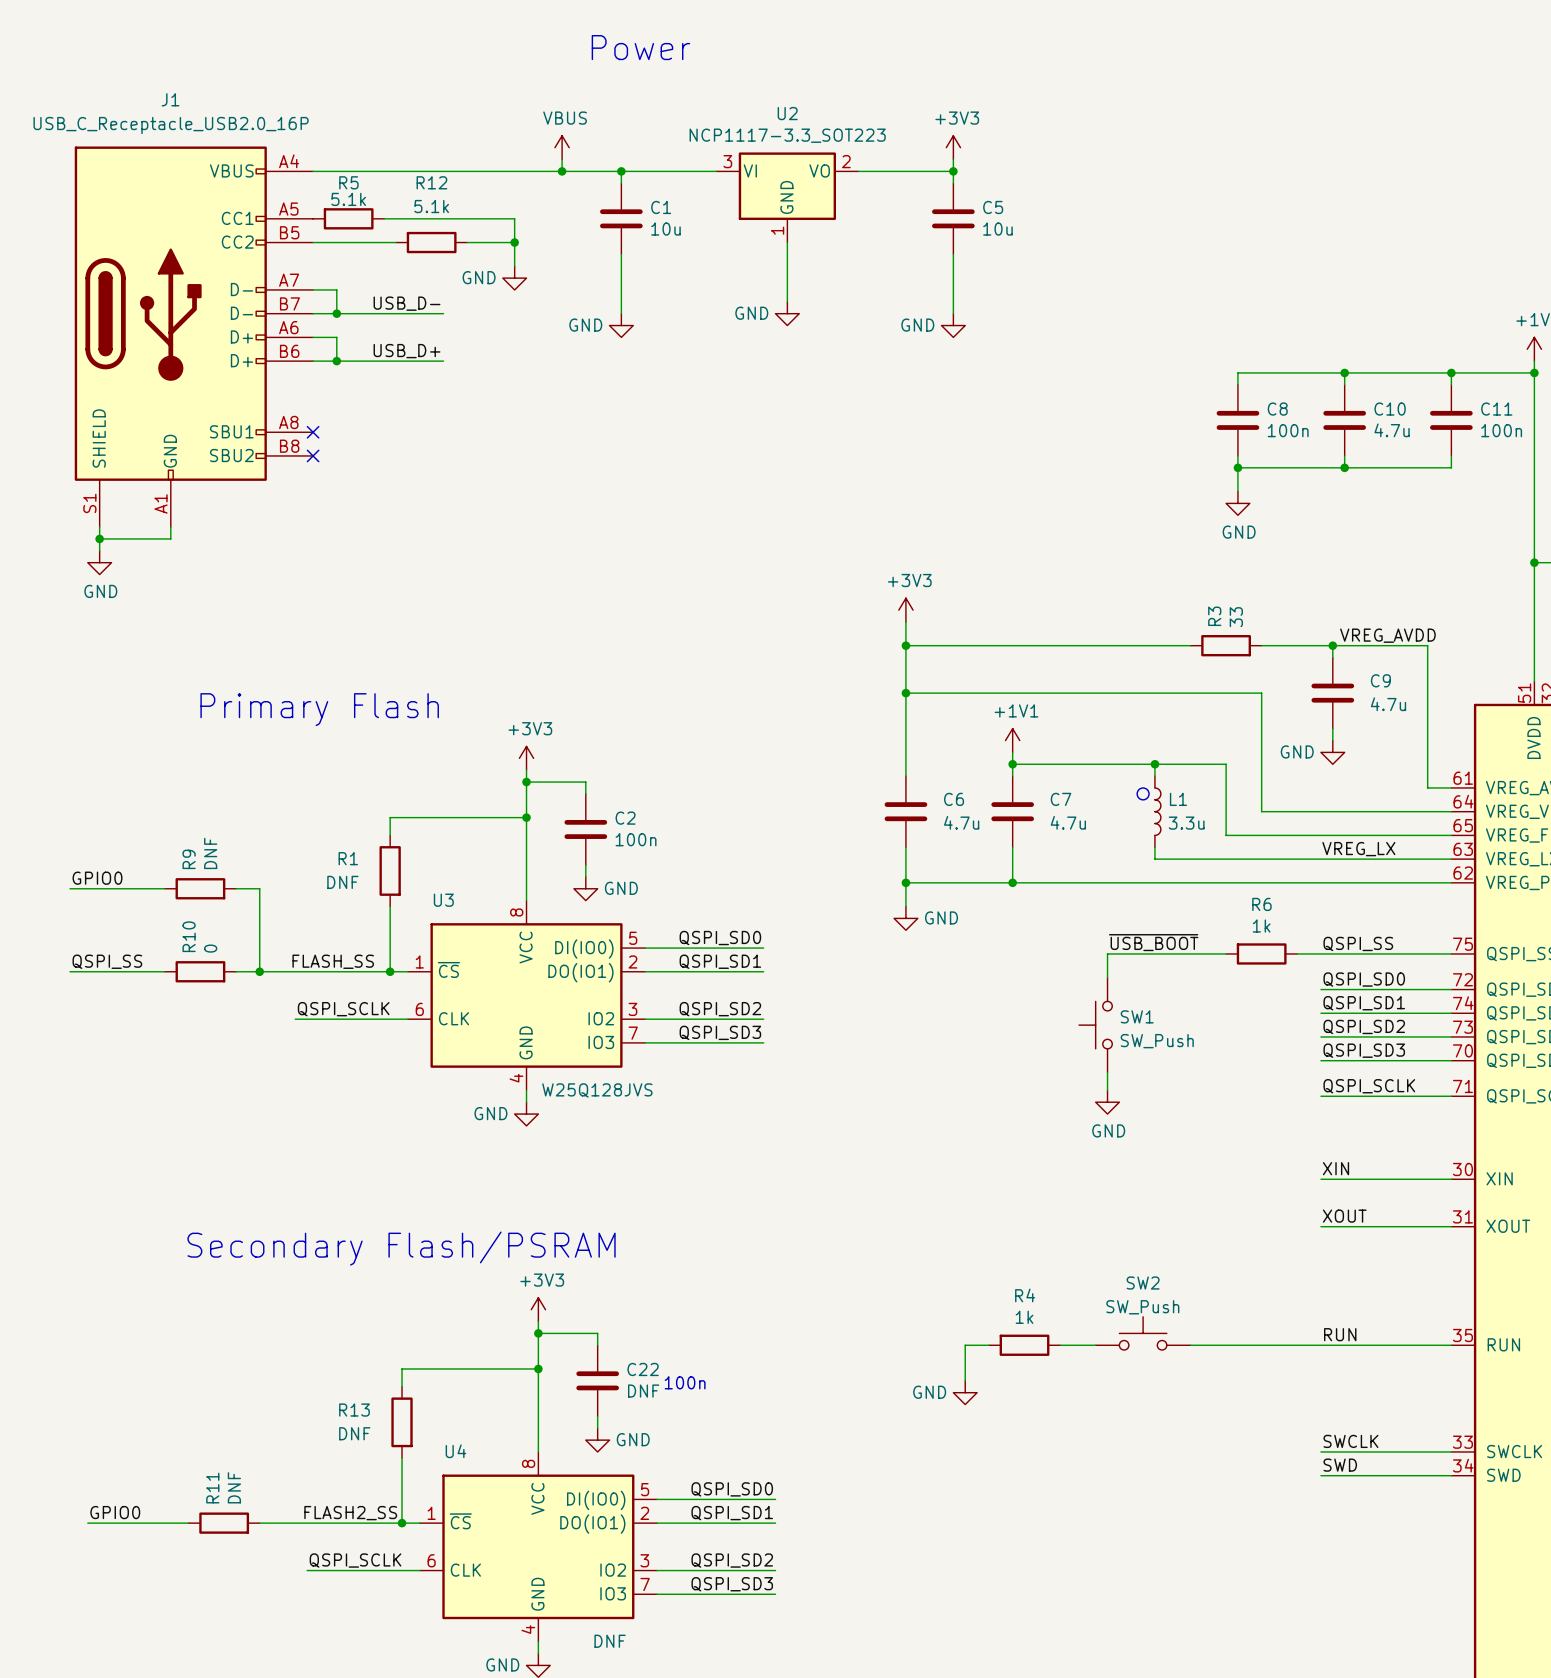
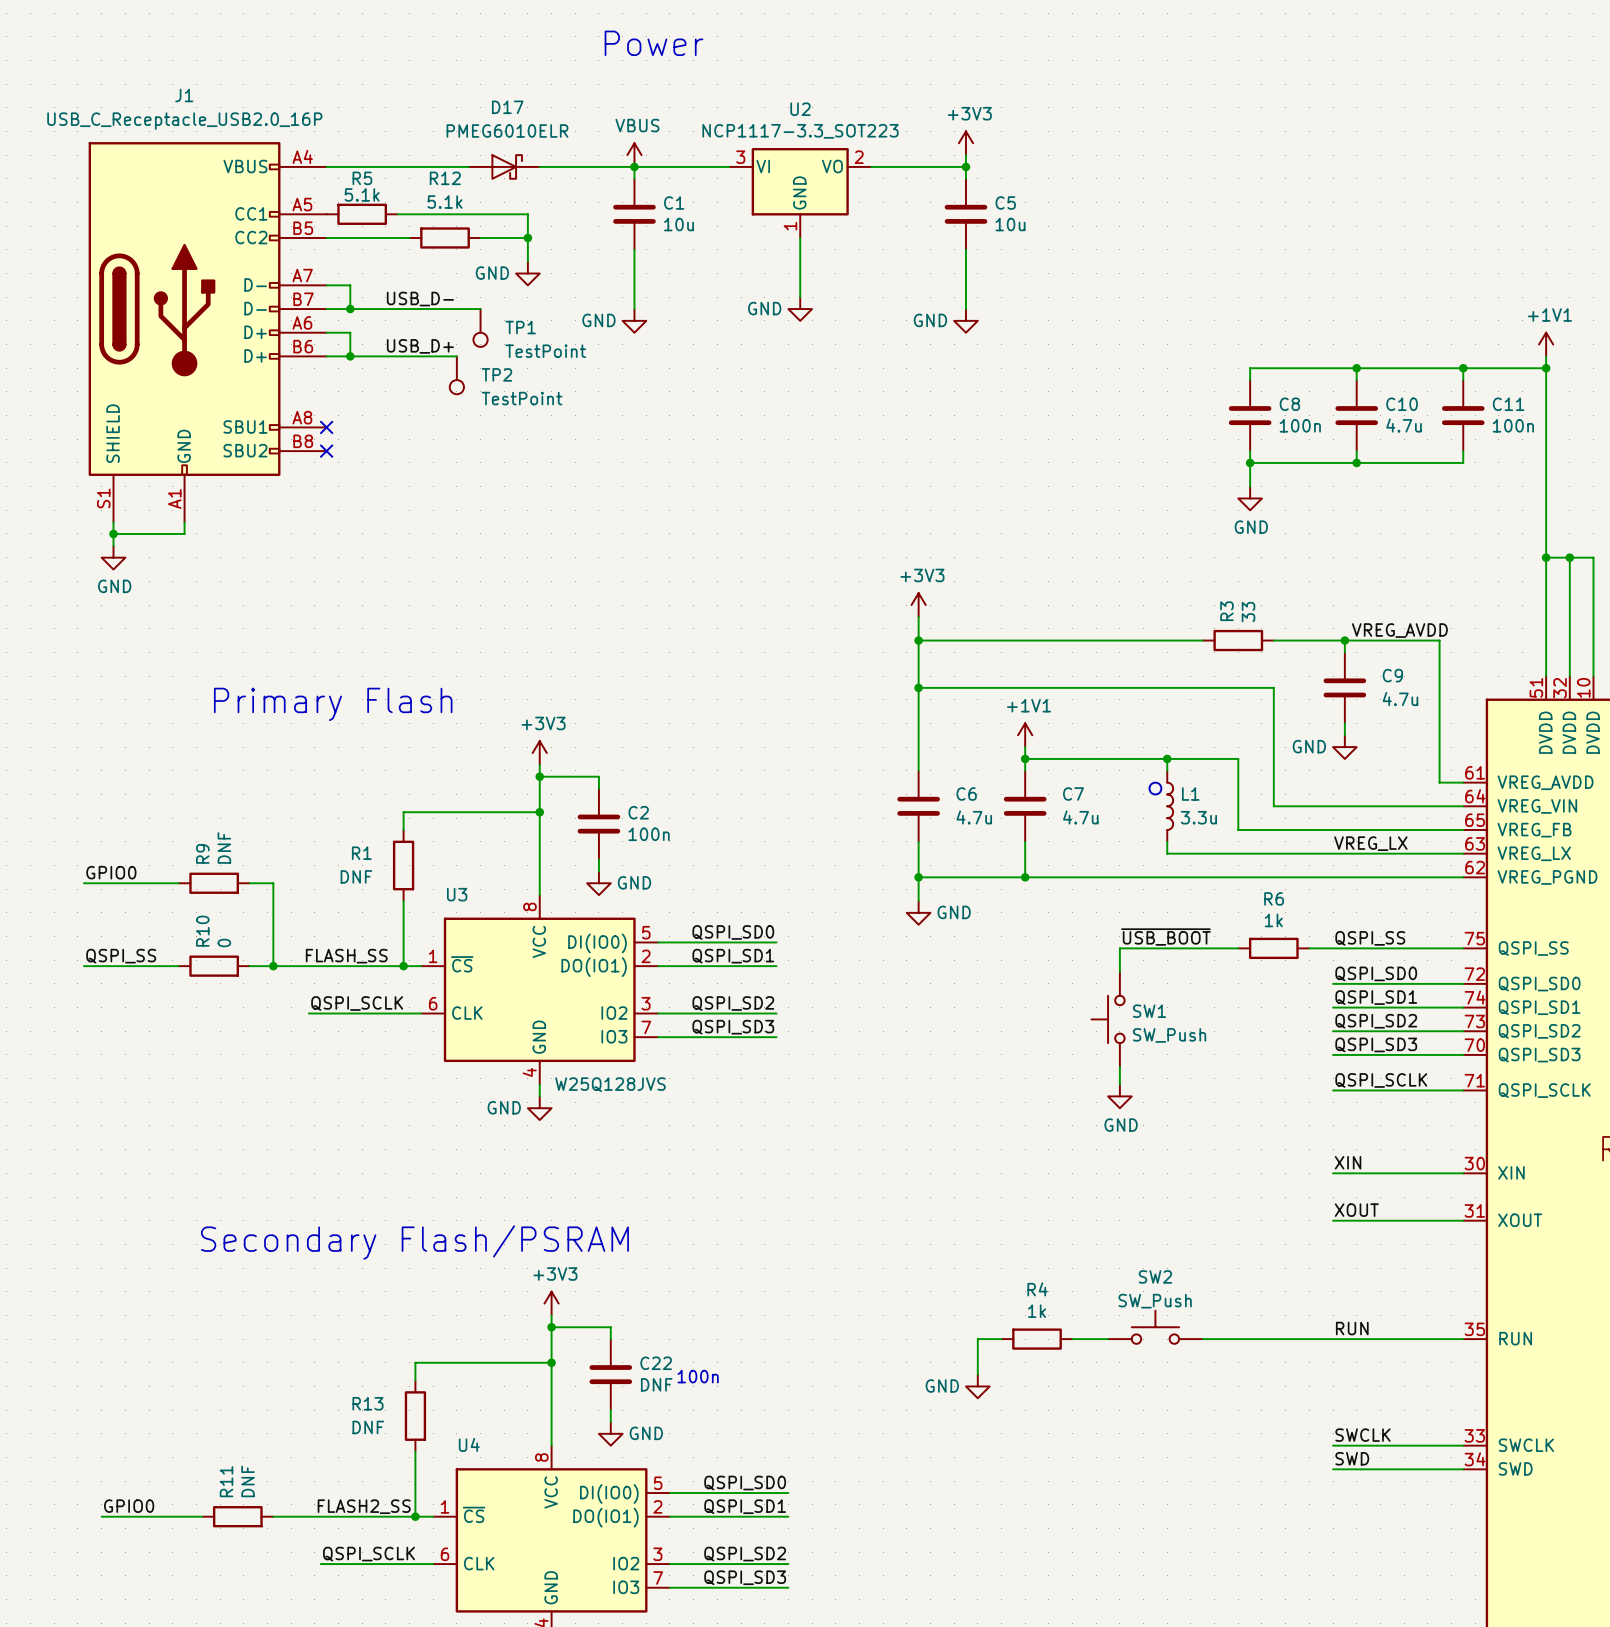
power symbol position: VBUS (562, 147) -> VBUS (634, 155)
wire: (562, 159) (562, 171) -> none
D17: none -> PMEG6010ELR (504, 166)
junction: (562, 171) -> none
wire: none -> (456, 309) (480, 309)
TP1: none -> TestPoint (480, 327)
TP2: none -> TestPoint (456, 375)

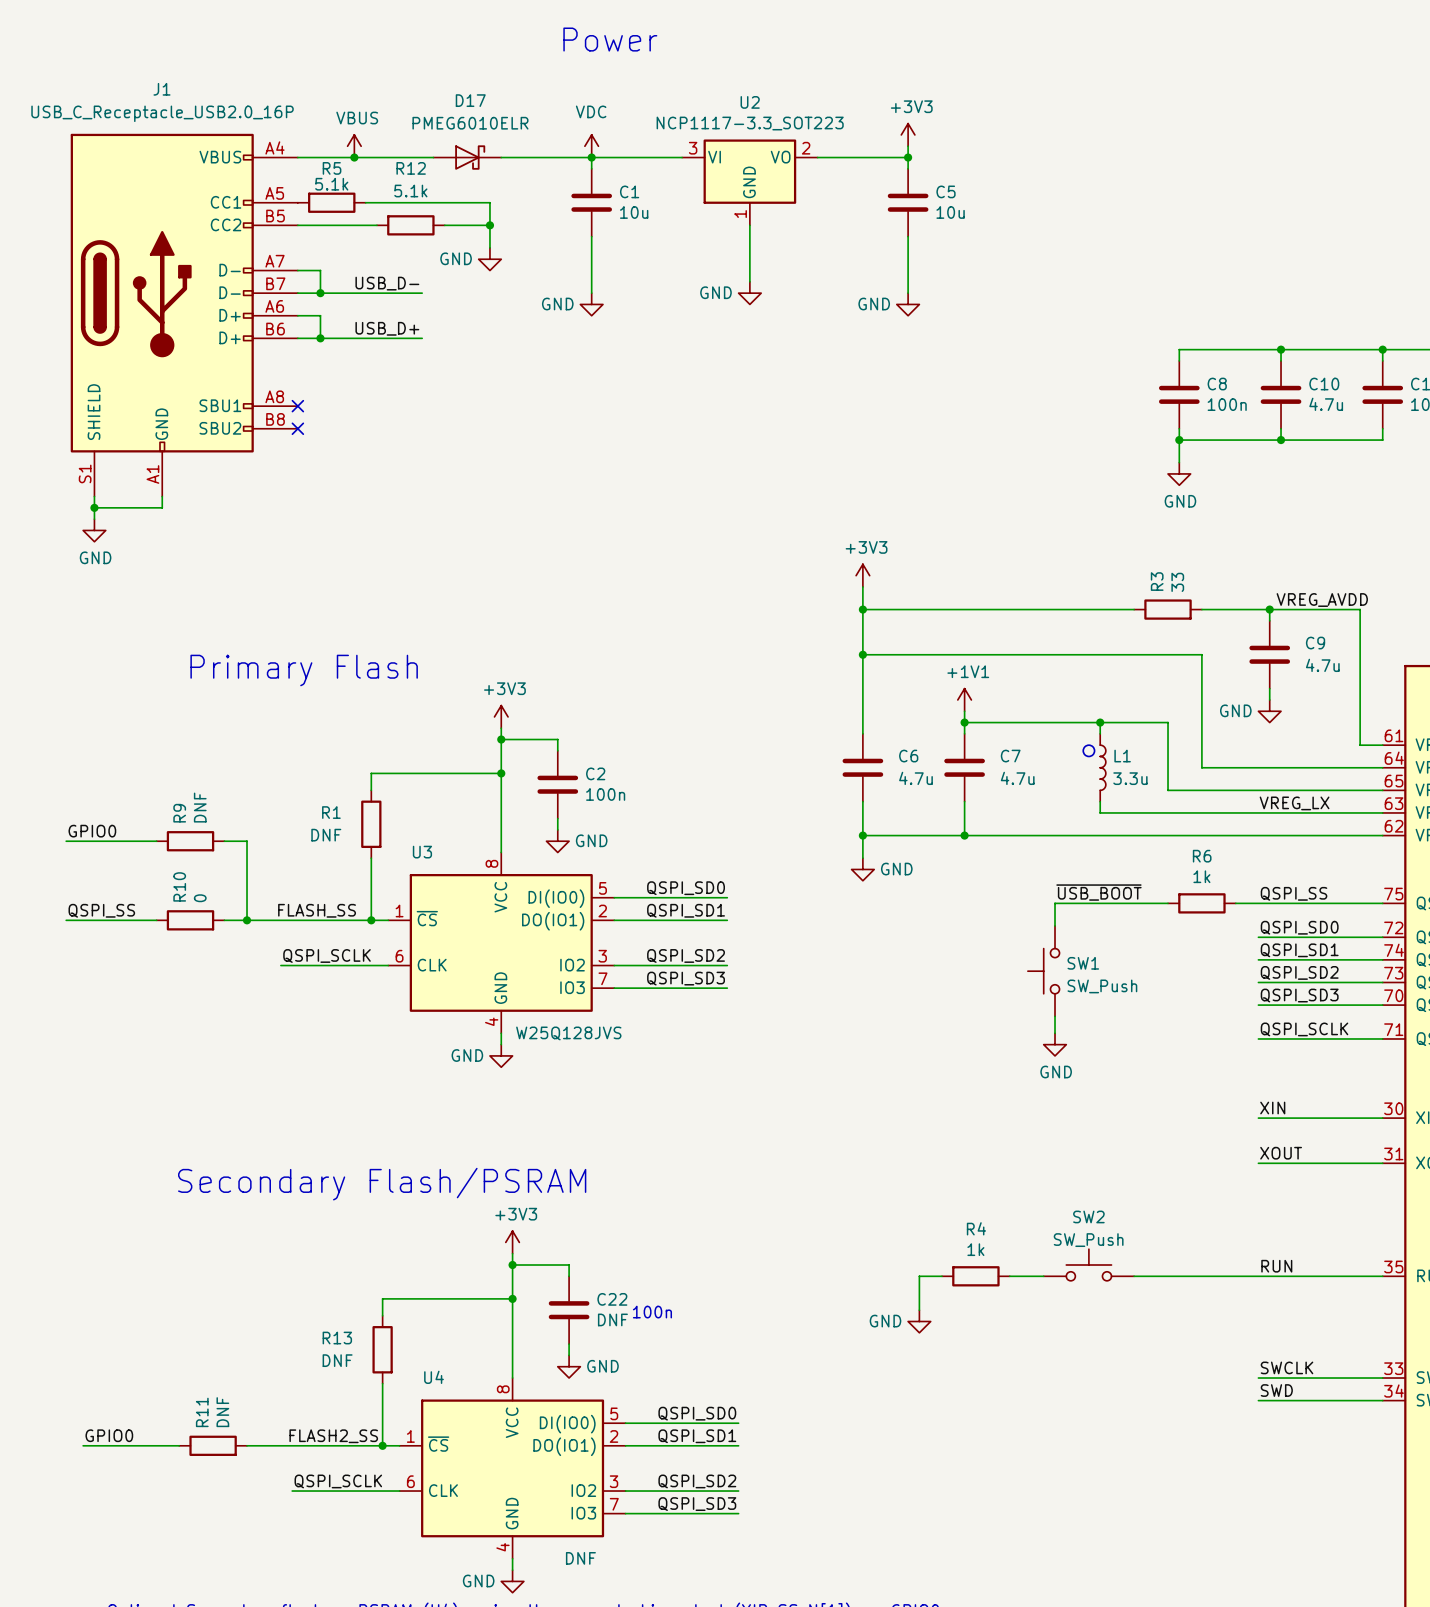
power symbol: none -> VBUS (354, 146)
power symbol: VBUS (634, 155) -> VDC (591, 146)
junction: none -> (354, 157)
wire: (456, 309) (480, 309) -> none
TP1: TestPoint (480, 327) -> none
TP2: TestPoint (456, 375) -> none

